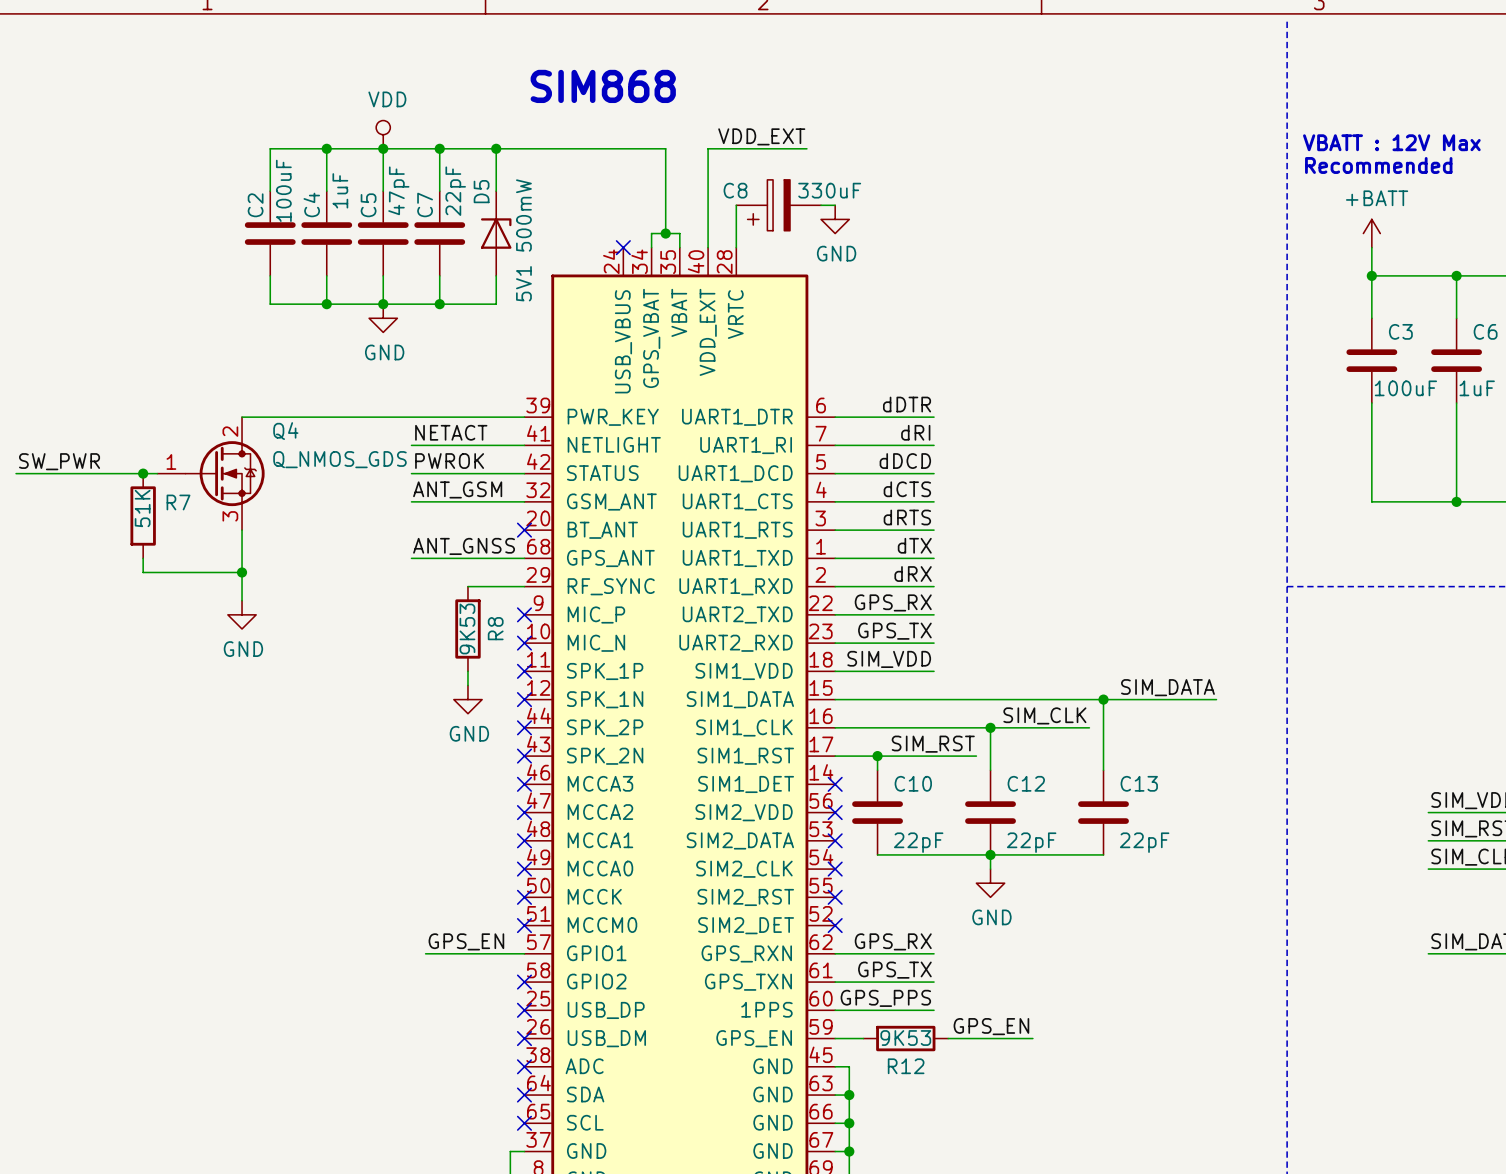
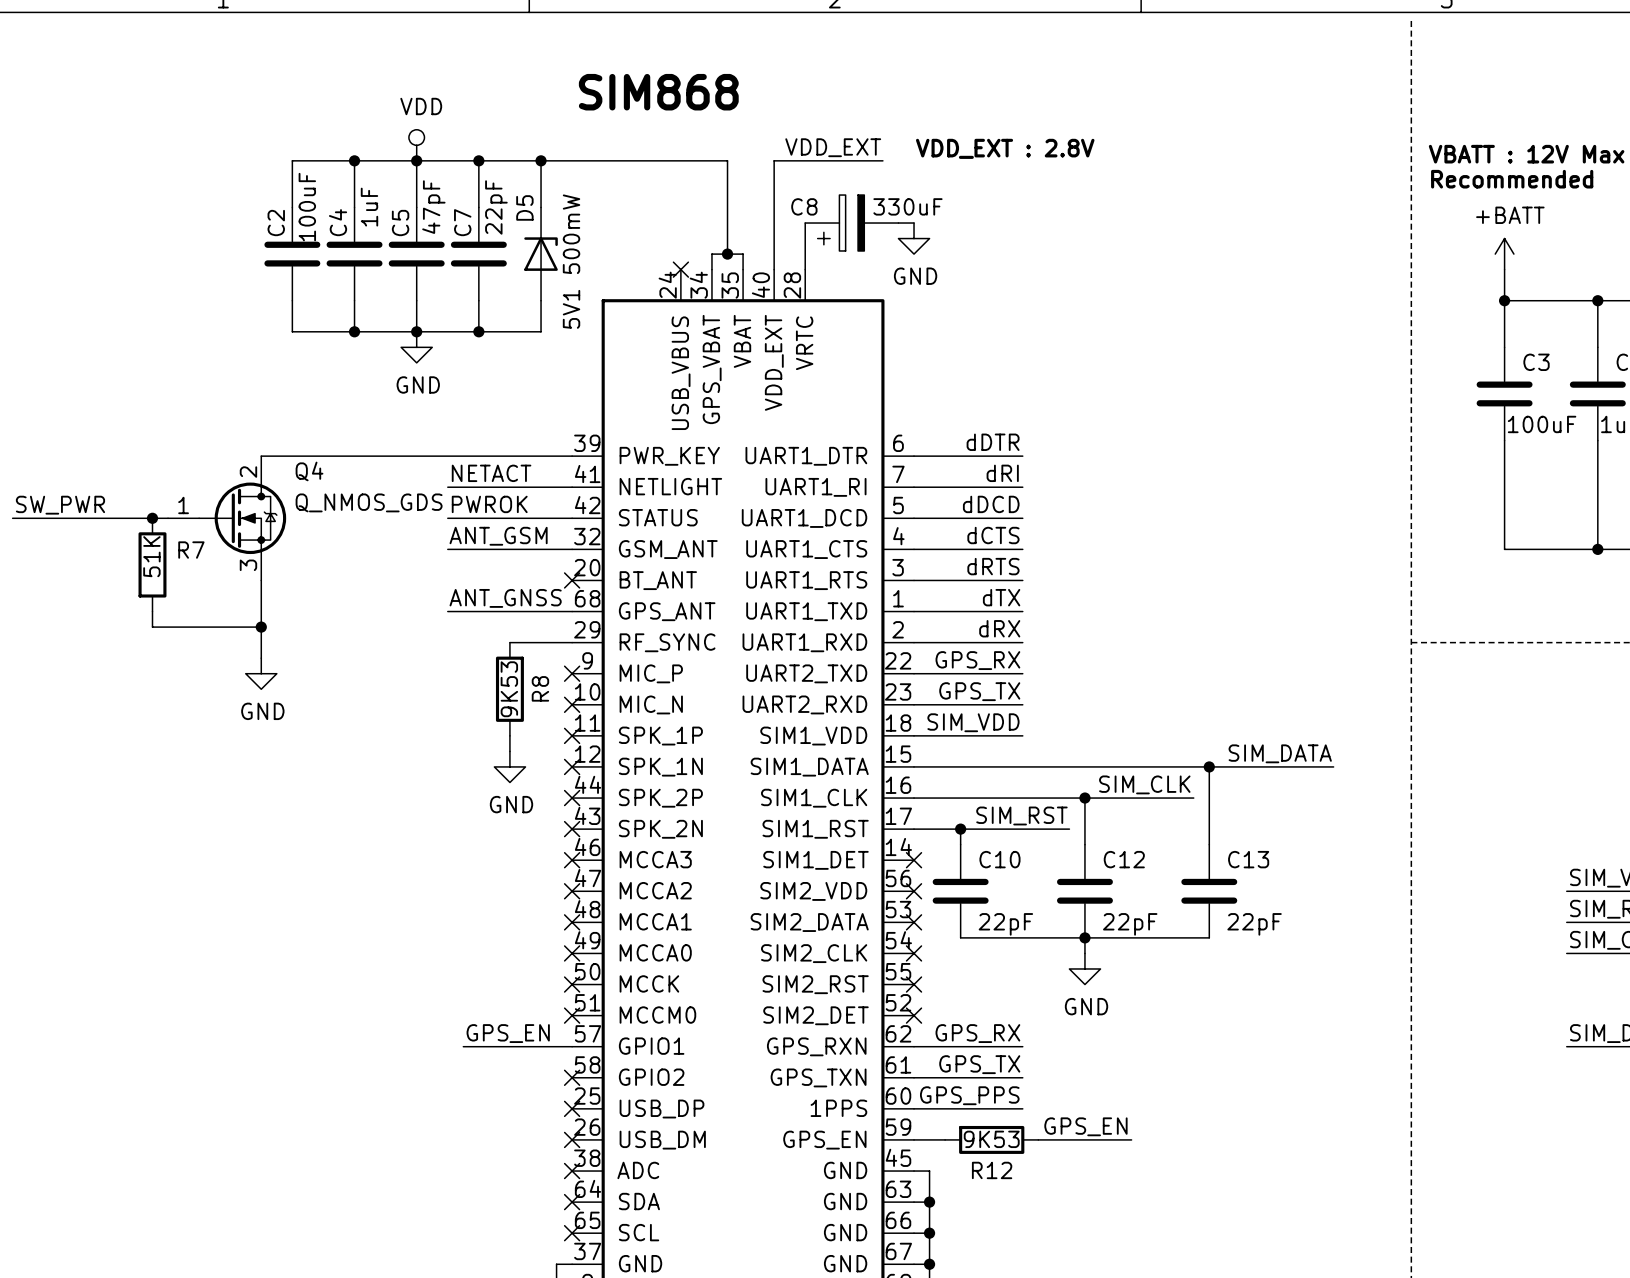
text: none -> VDD_EXT : 2.8V (1005, 148)

